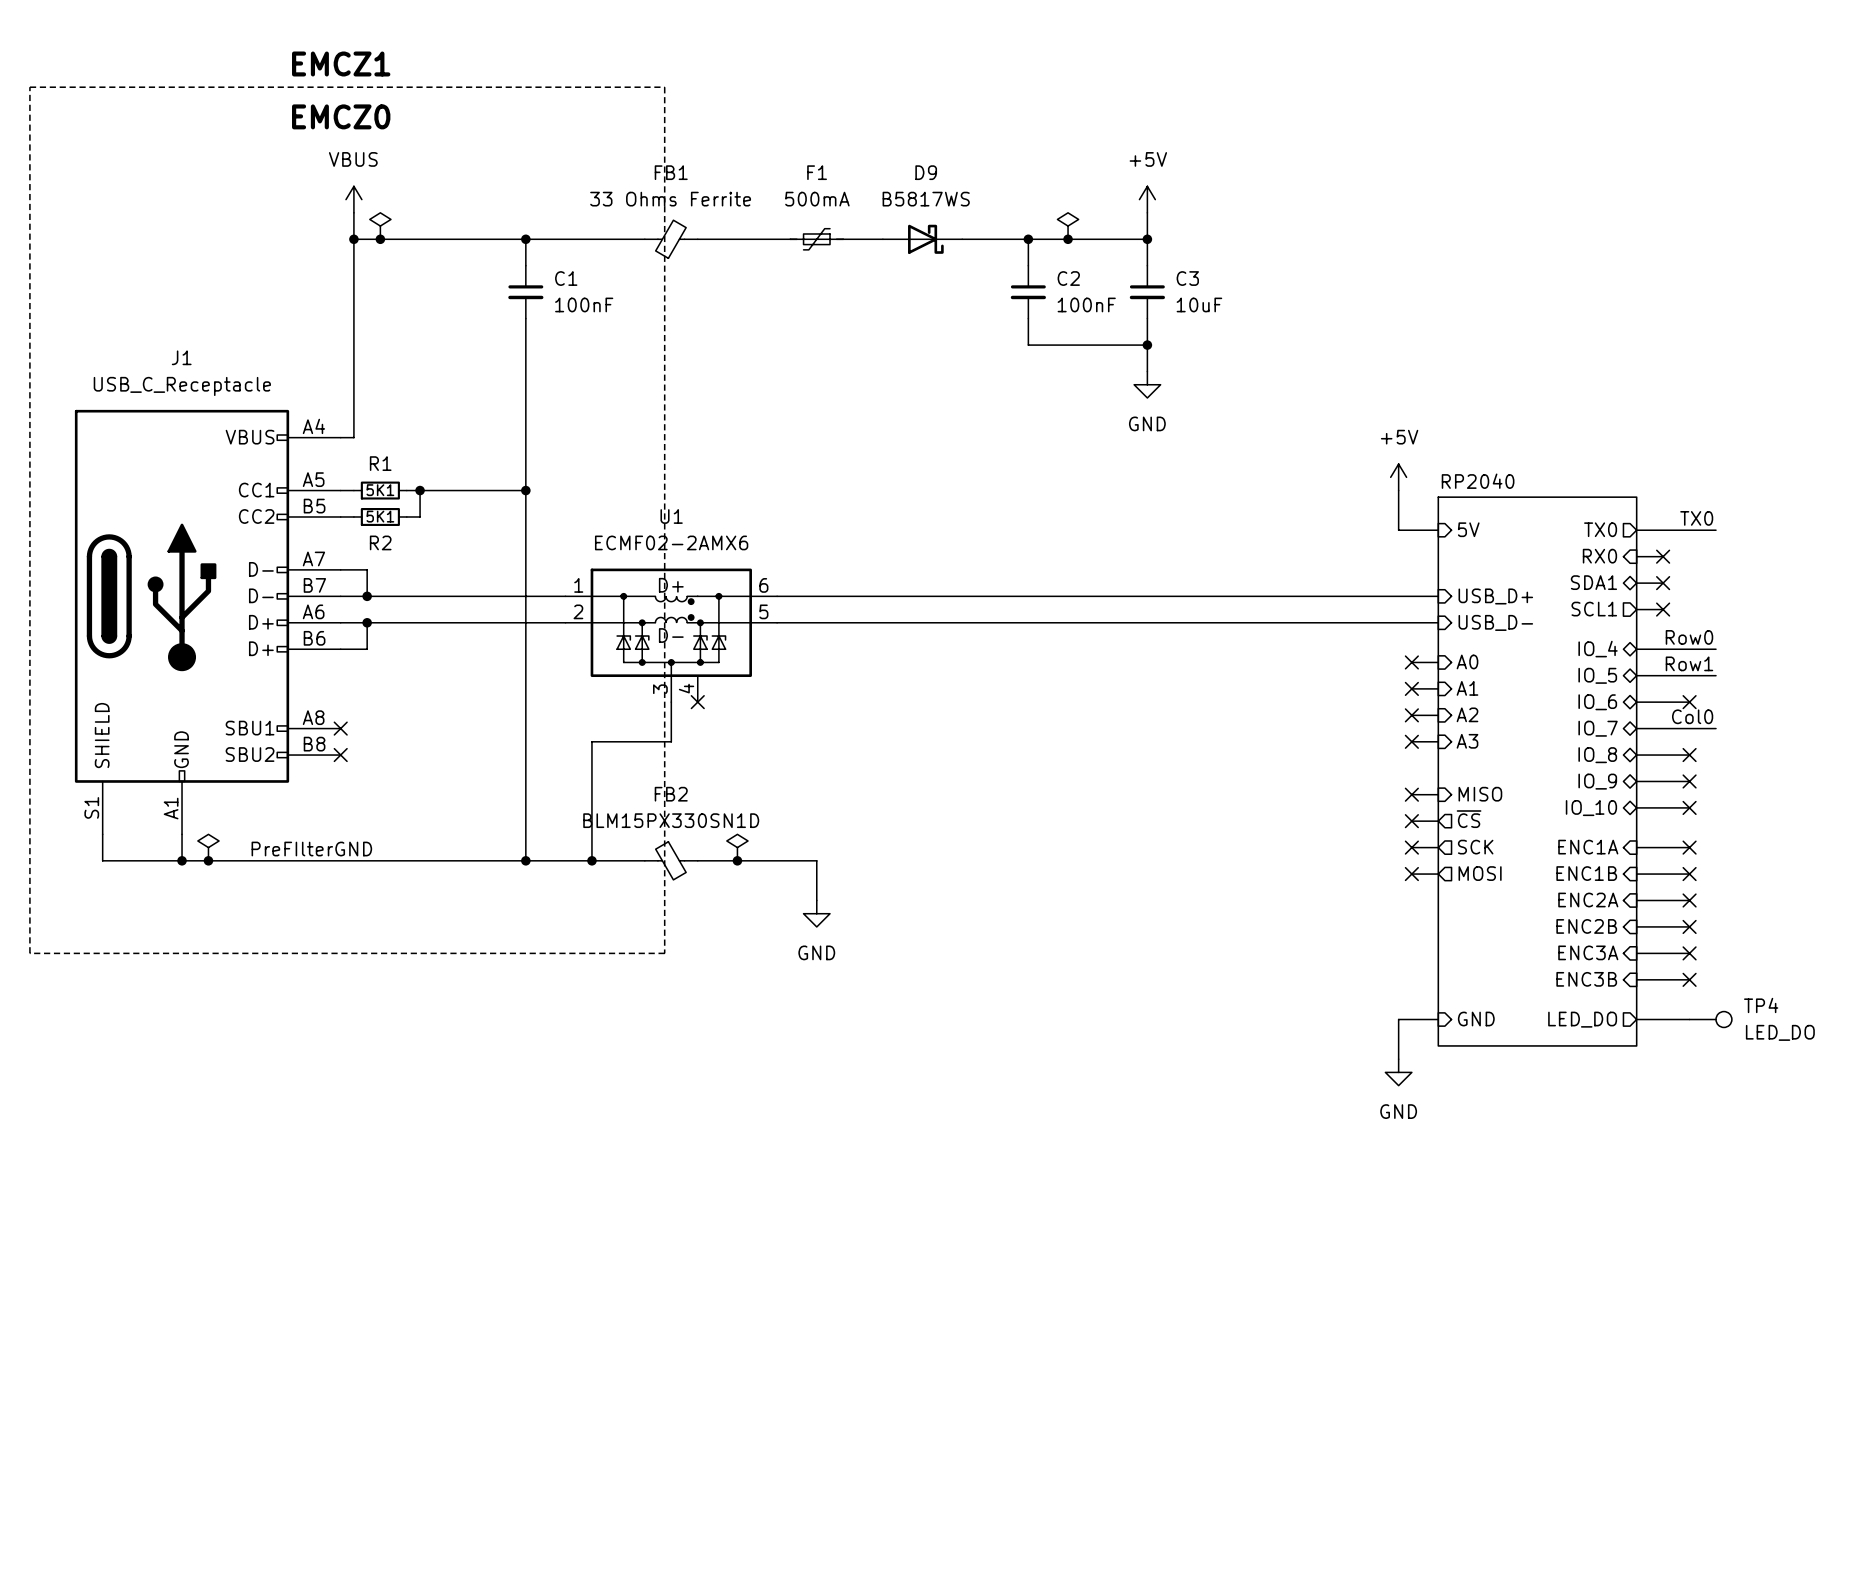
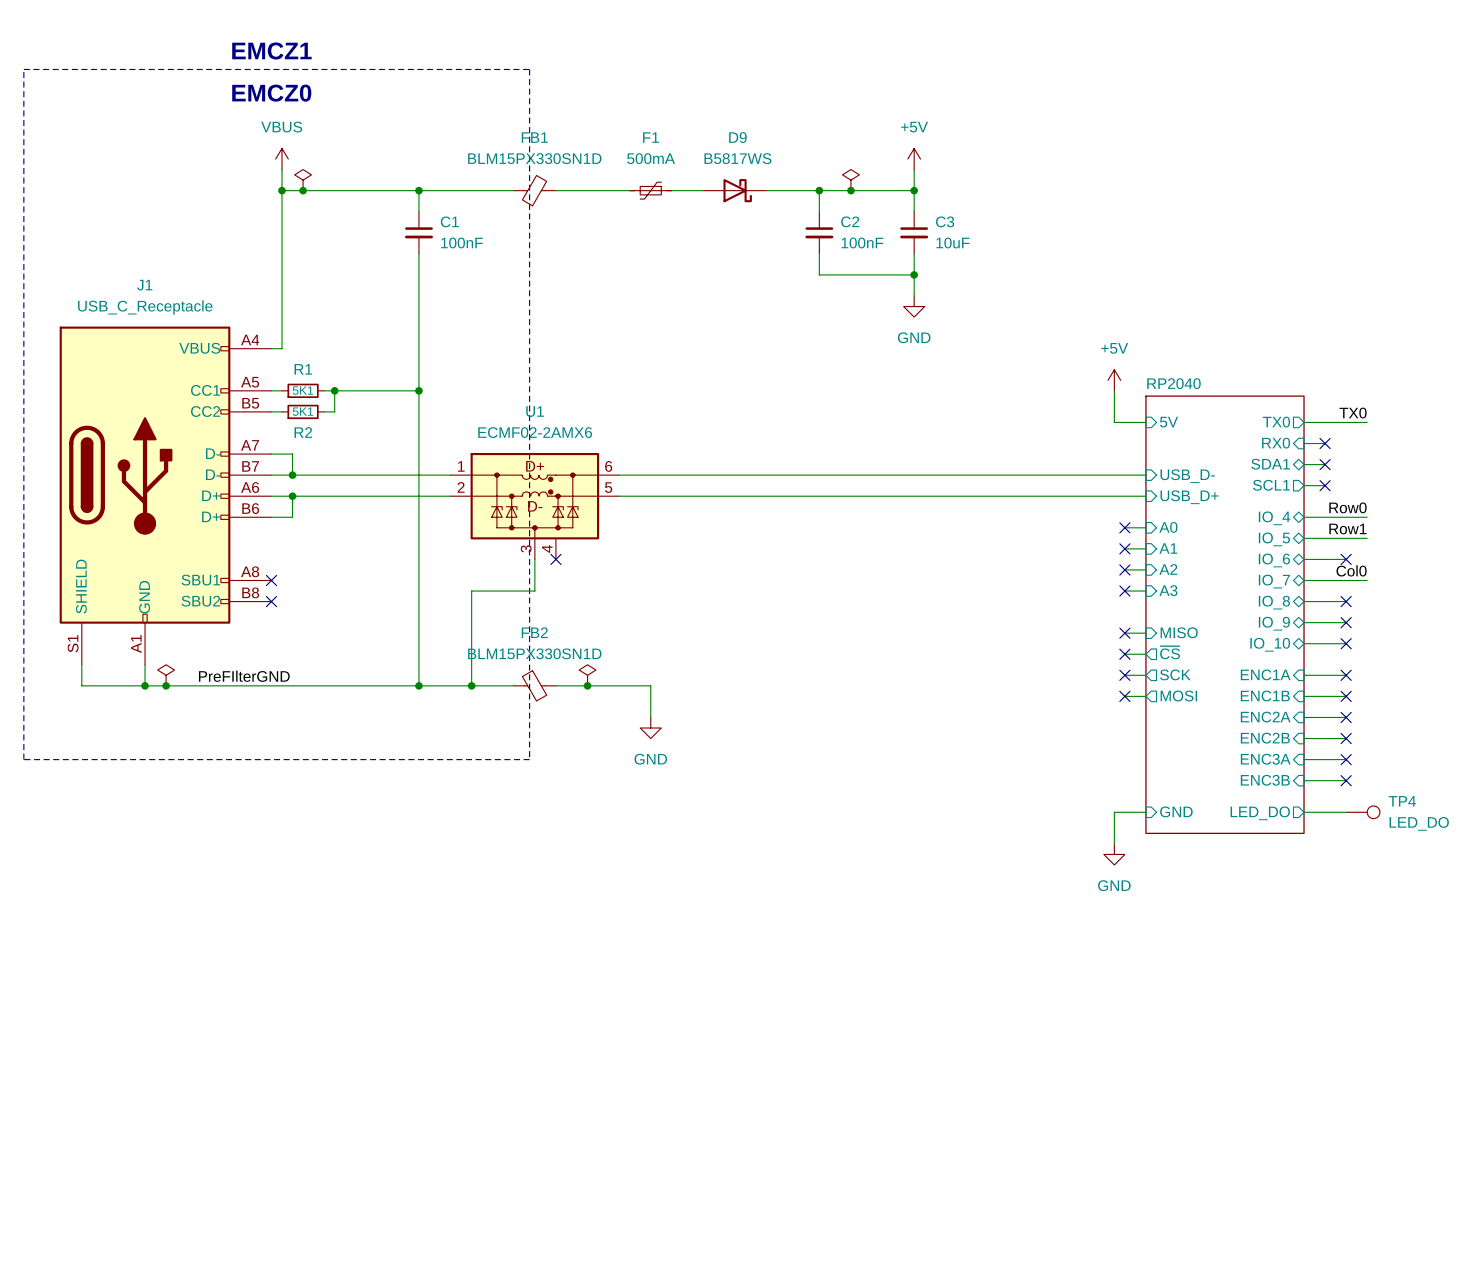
FB1 value: 33 Ohms Ferrite (670, 199) -> BLM15PX330SN1D (534, 158)
sheet pin: USB_D+ (1495, 596) -> USB_D- (1187, 476)
sheet pin: USB_D- (1495, 622) -> USB_D+ (1189, 497)

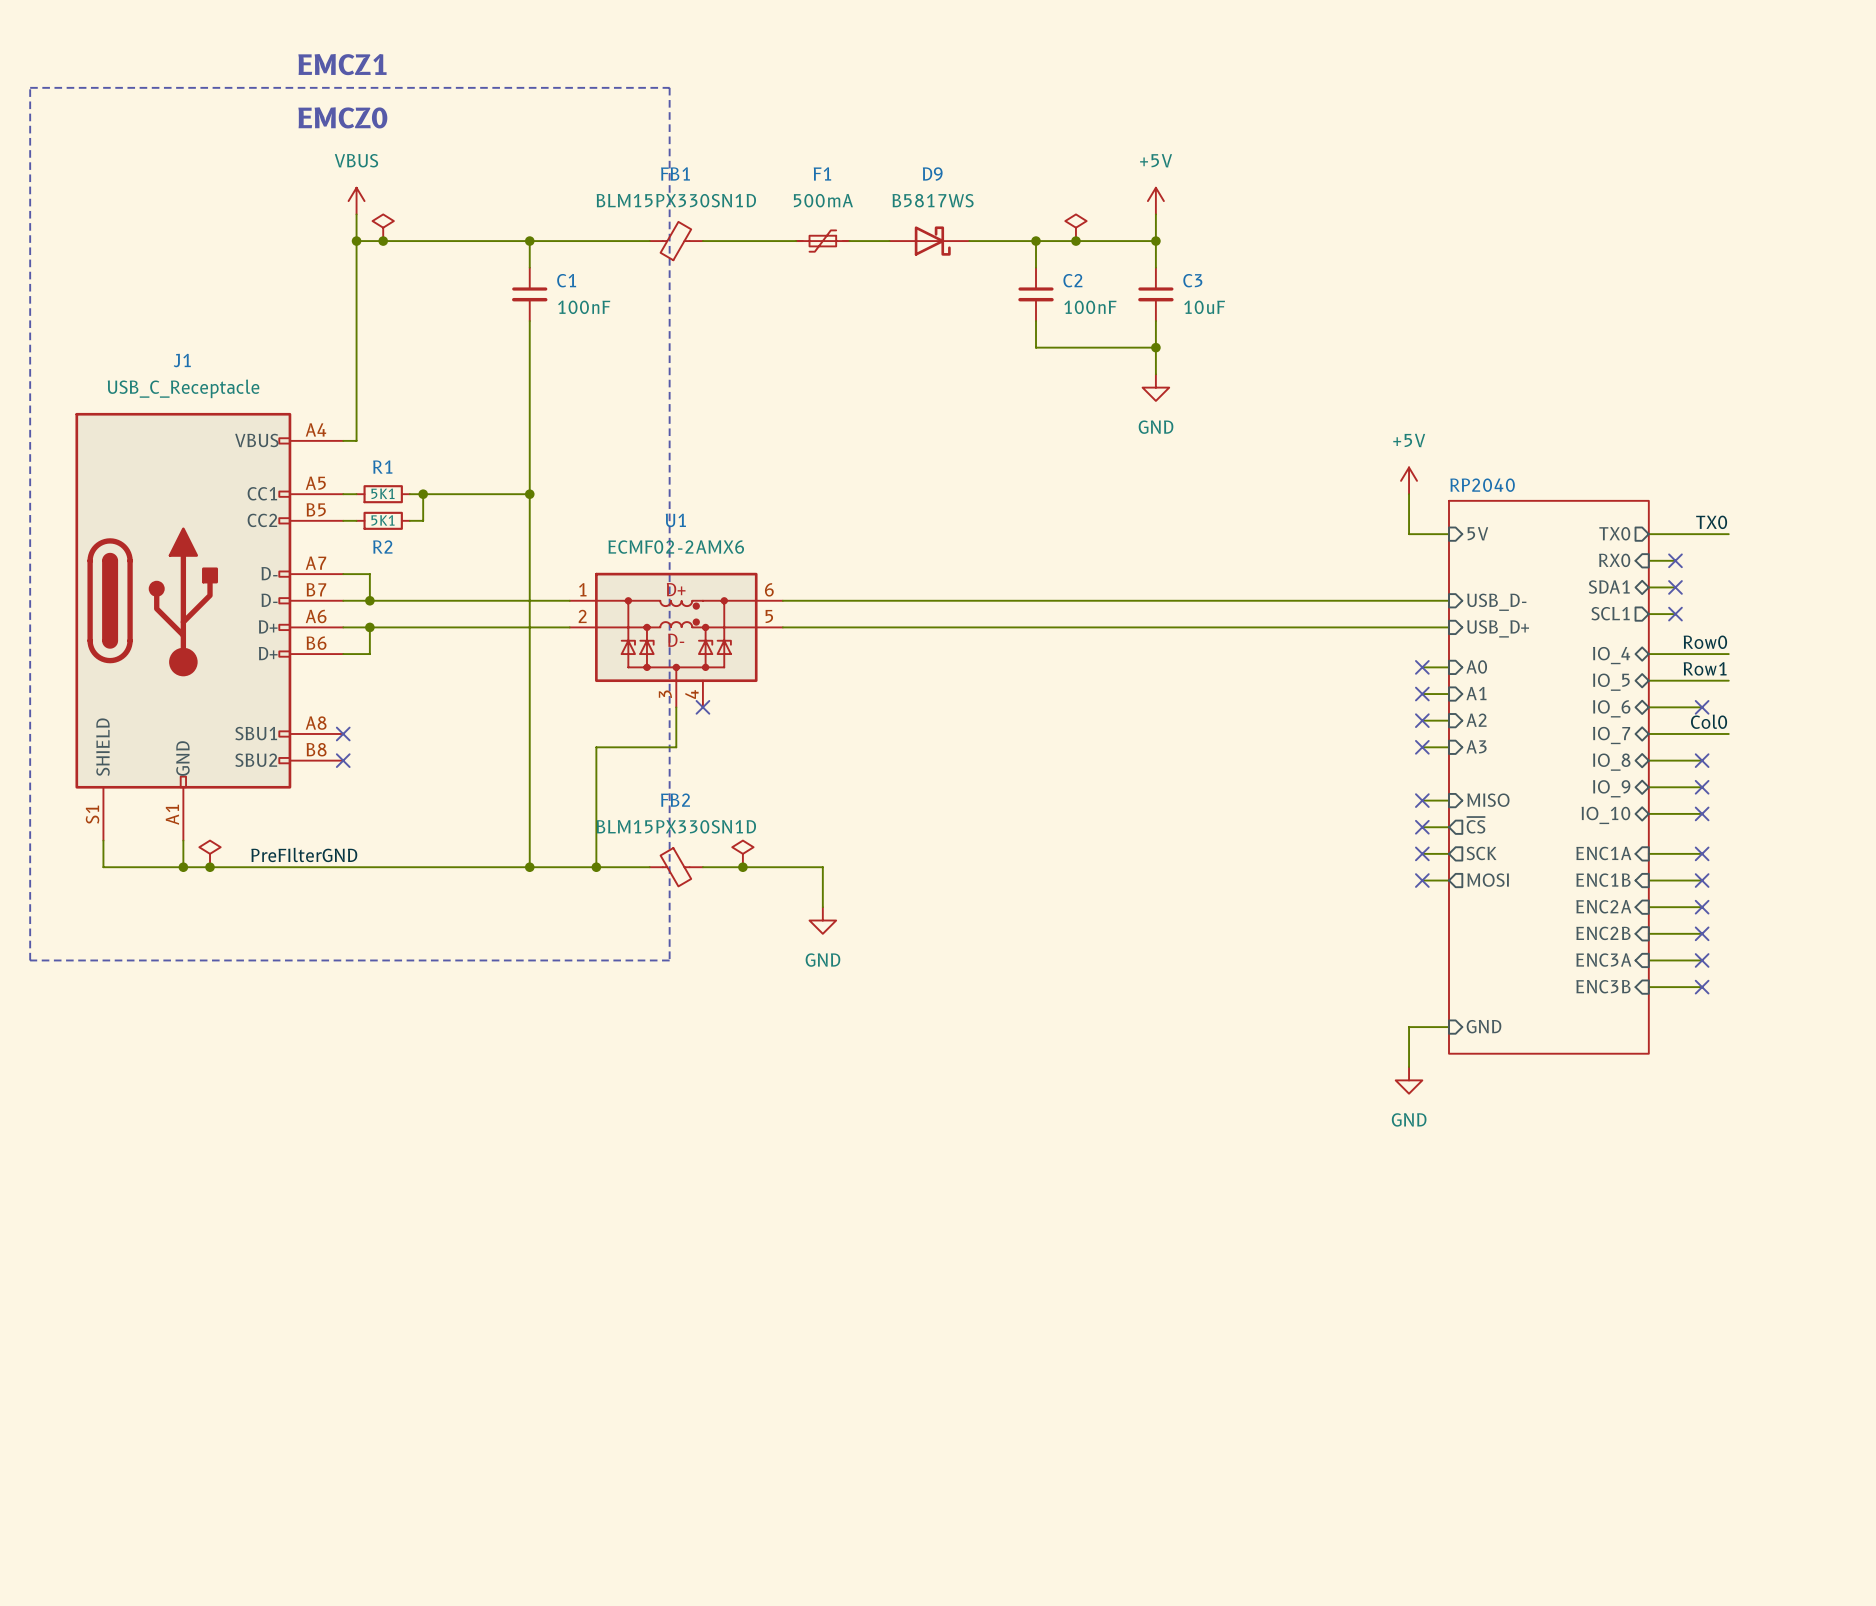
wire: (1304, 812) (1346, 812) -> none
TP4: LED_DO (1363, 812) -> none
sheet pin: LED_DO (1260, 813) -> none

